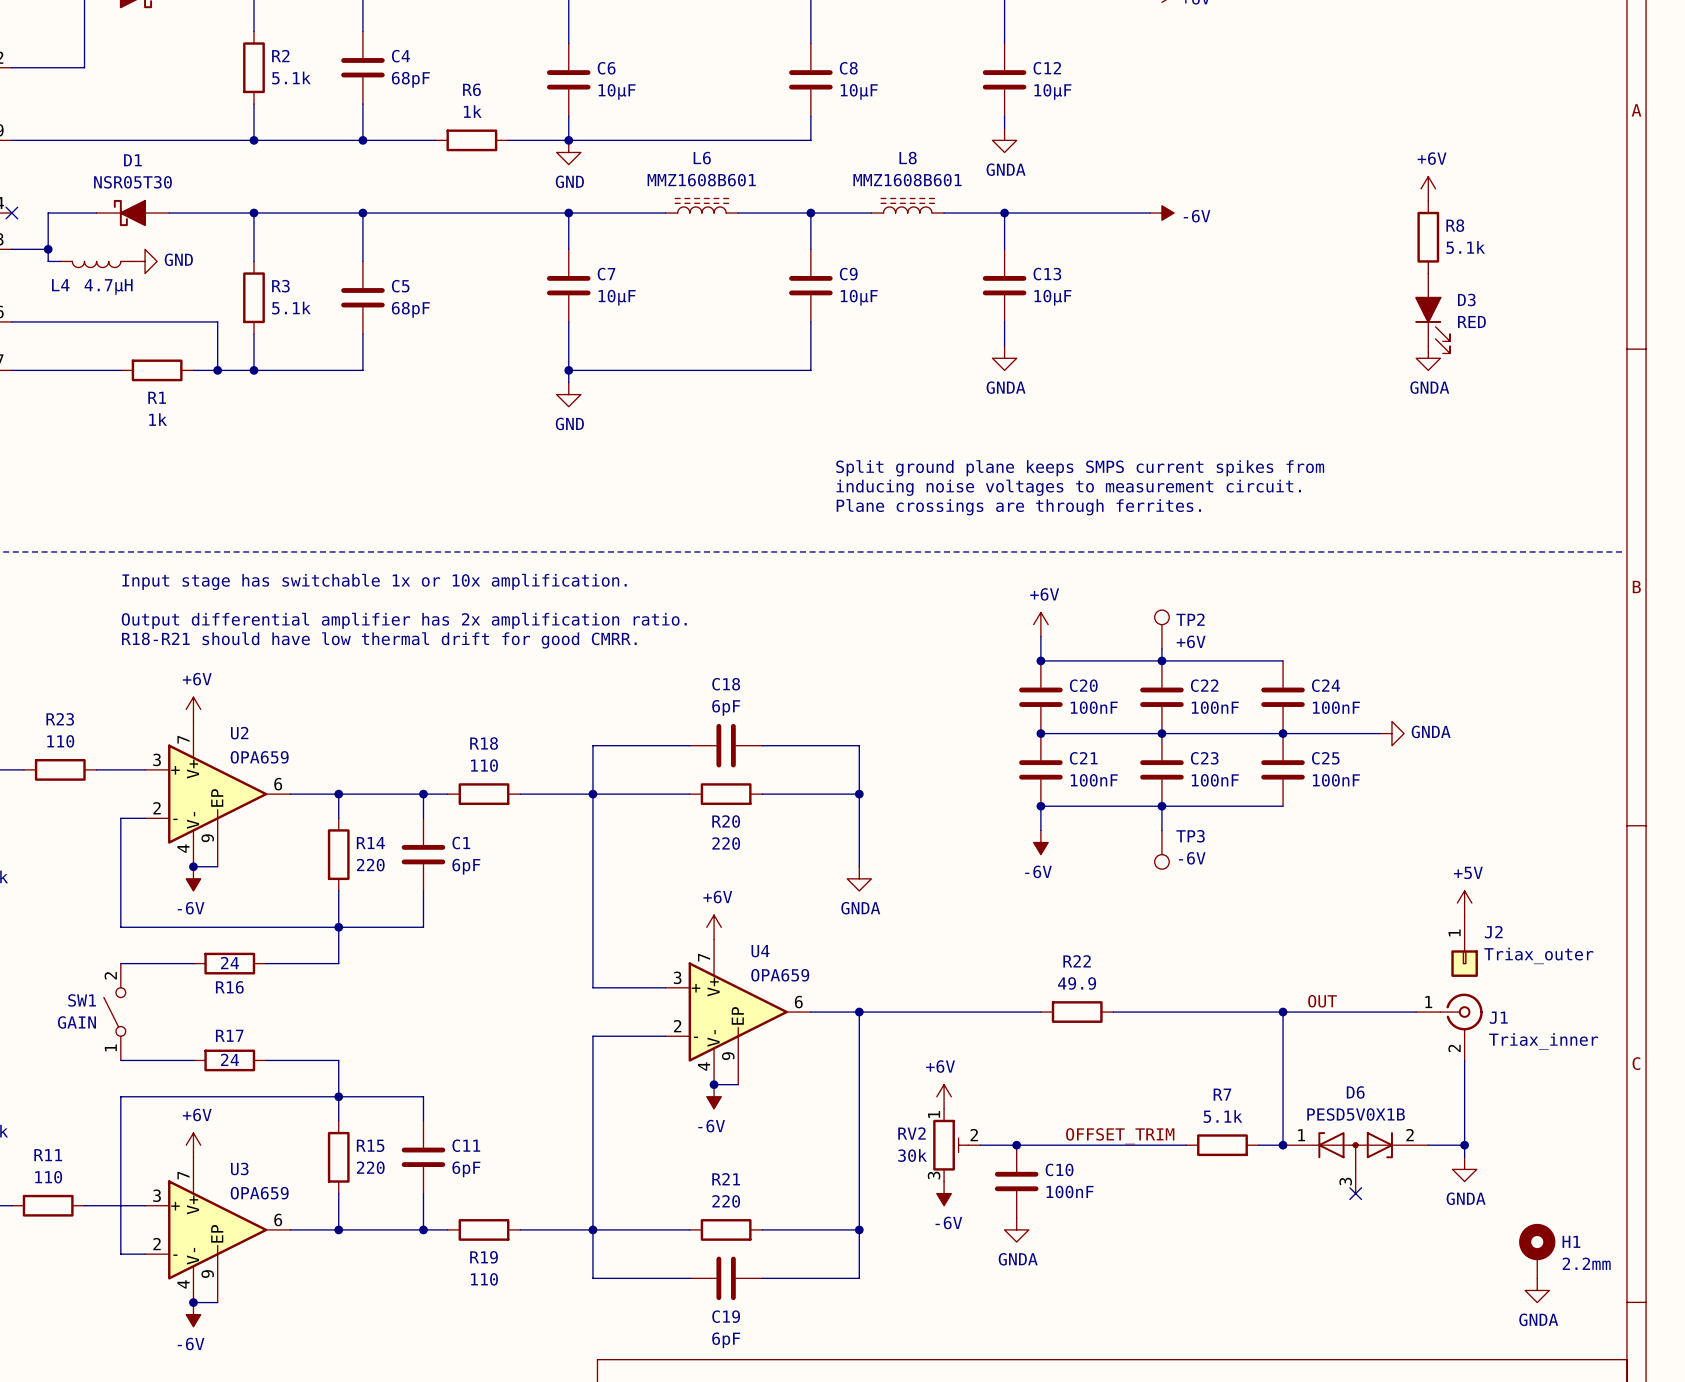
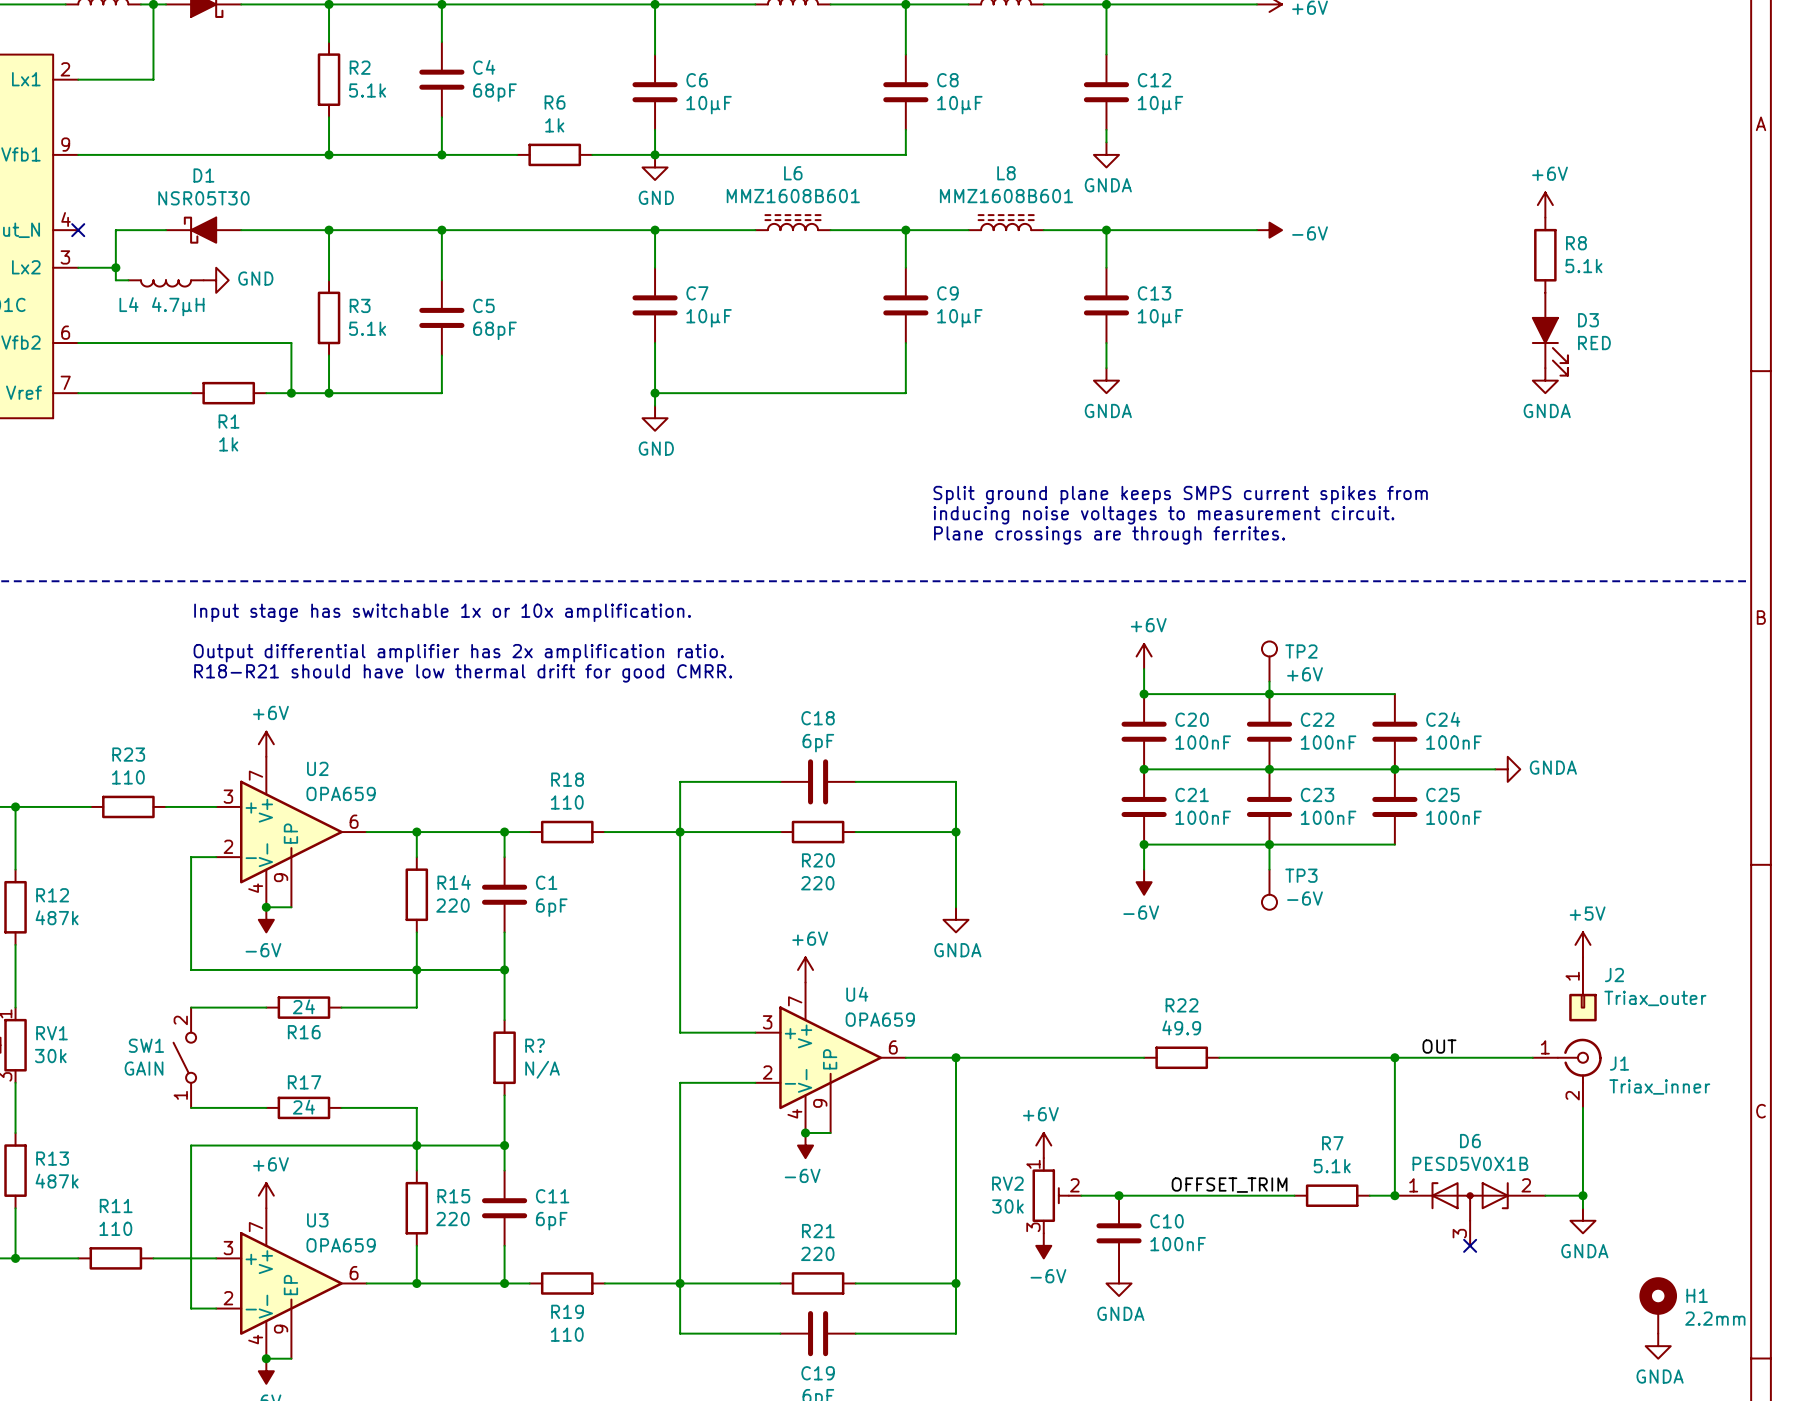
wire: none -> (504, 969) (504, 1020)
junction: none -> (504, 969)
R?: none -> N/A (504, 1057)
wire: none -> (504, 1095) (504, 1145)
junction: none -> (504, 1145)

